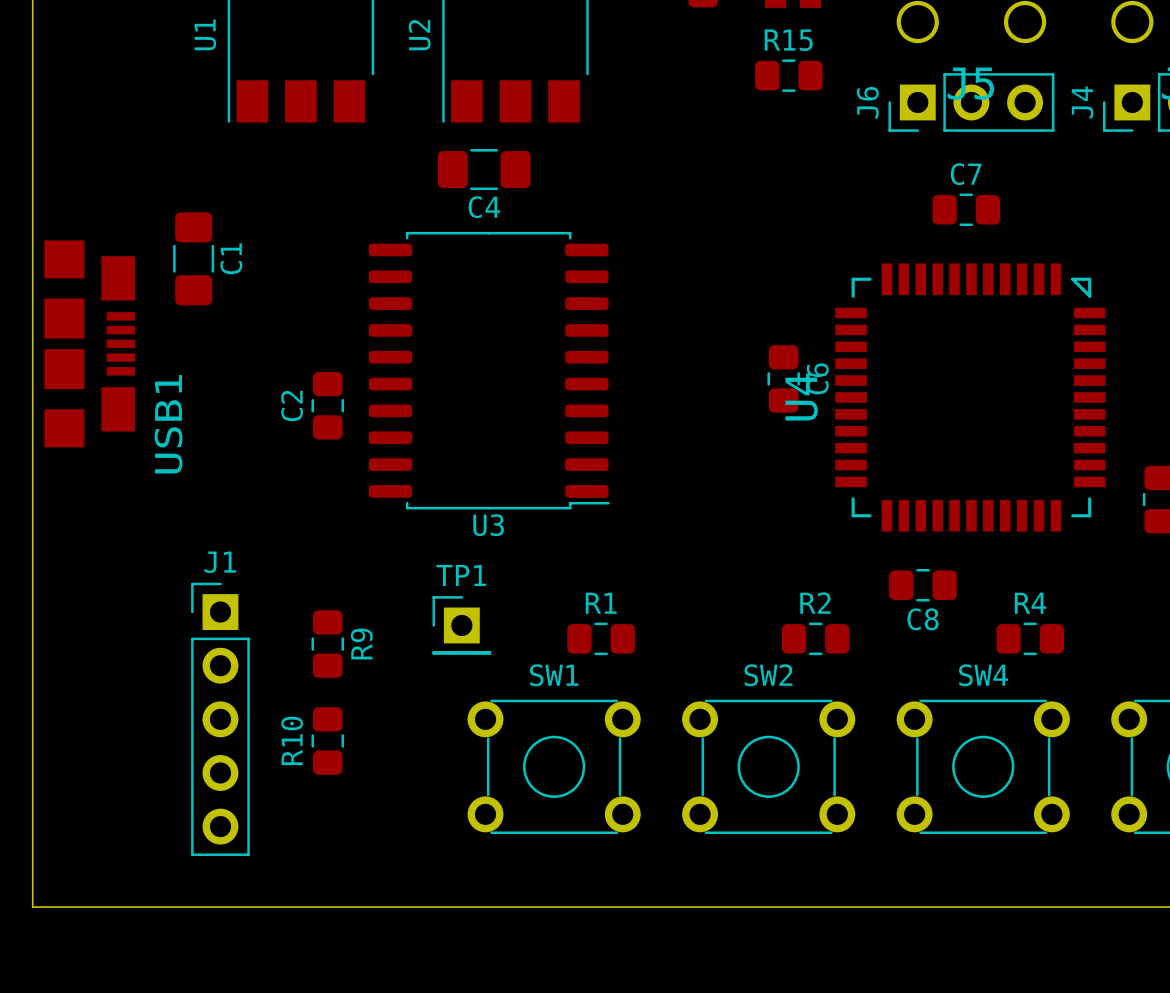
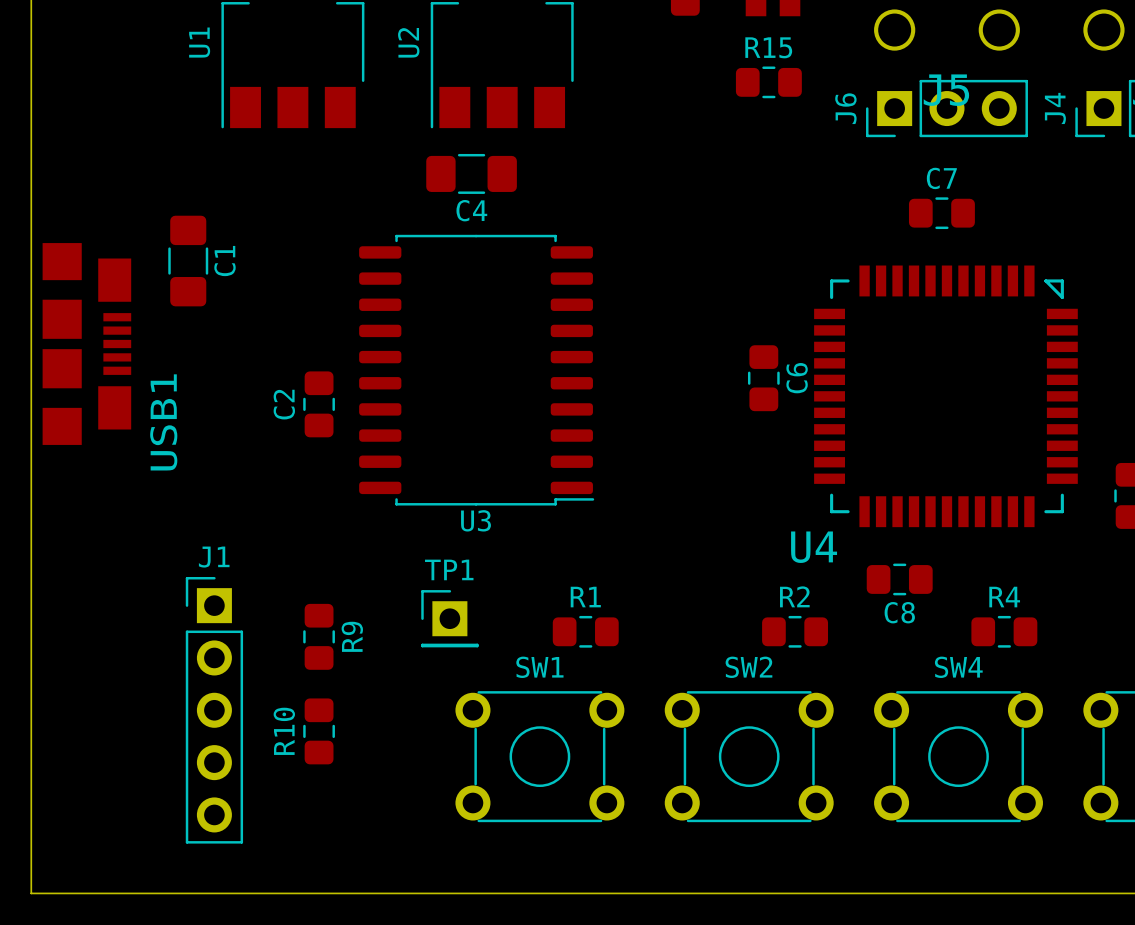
U4 name rotation: 0° (801, 396) -> 90° clockwise (814, 547)
U4 name position: U4 (801, 396) -> U4 (814, 547)

